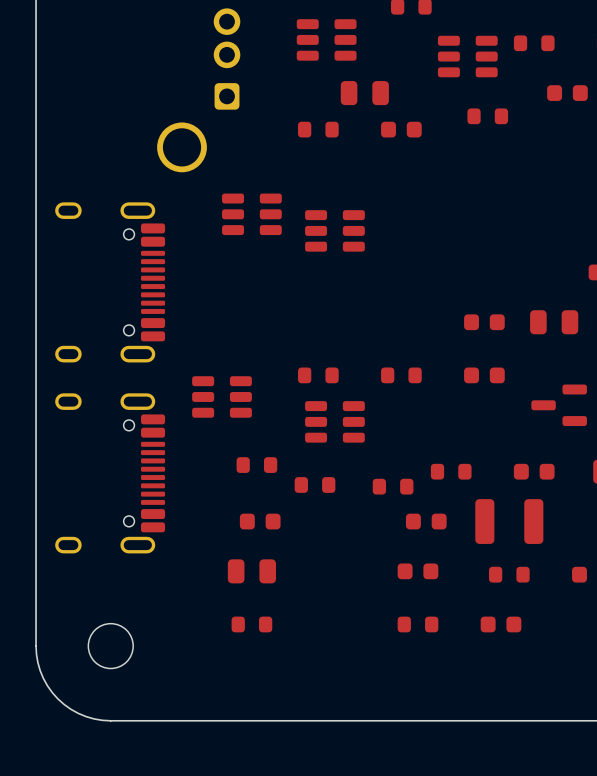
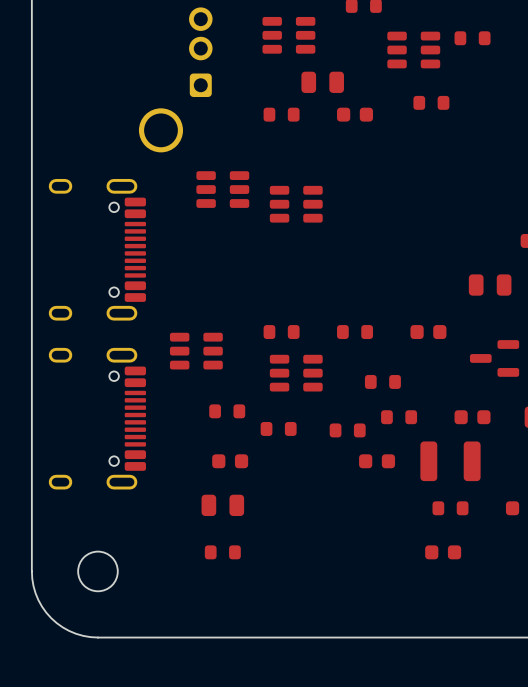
part: (567, 93) -> none
part: (484, 322) -> none
part: (417, 571) -> none
part position: (417, 624) -> (382, 381)

